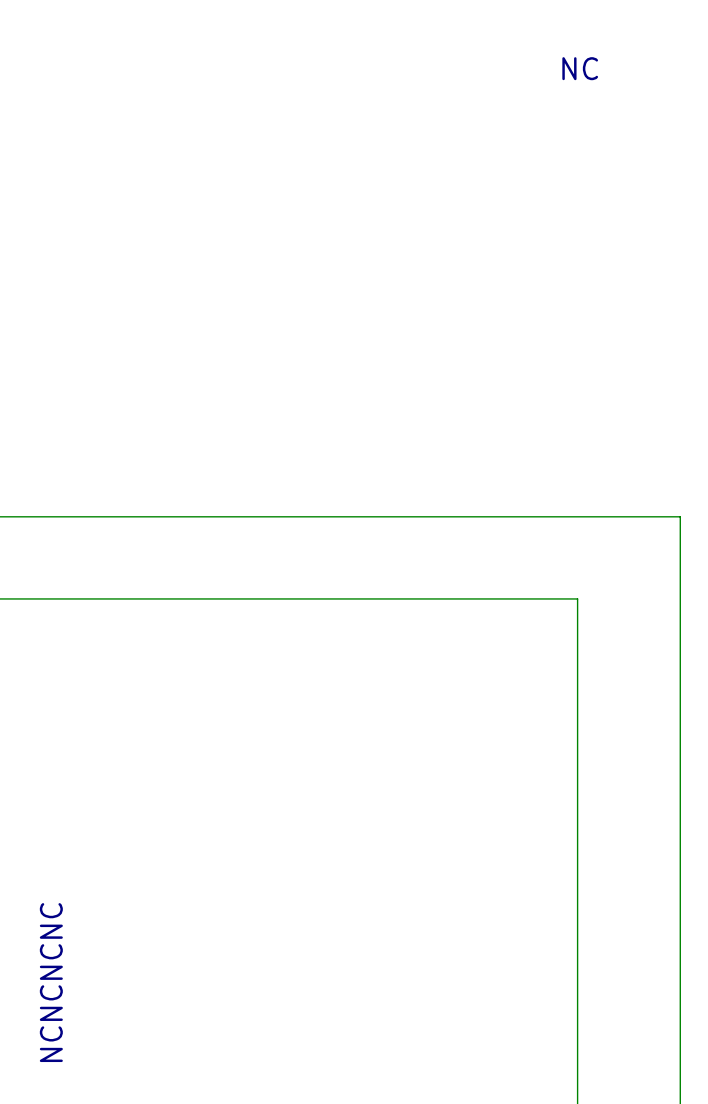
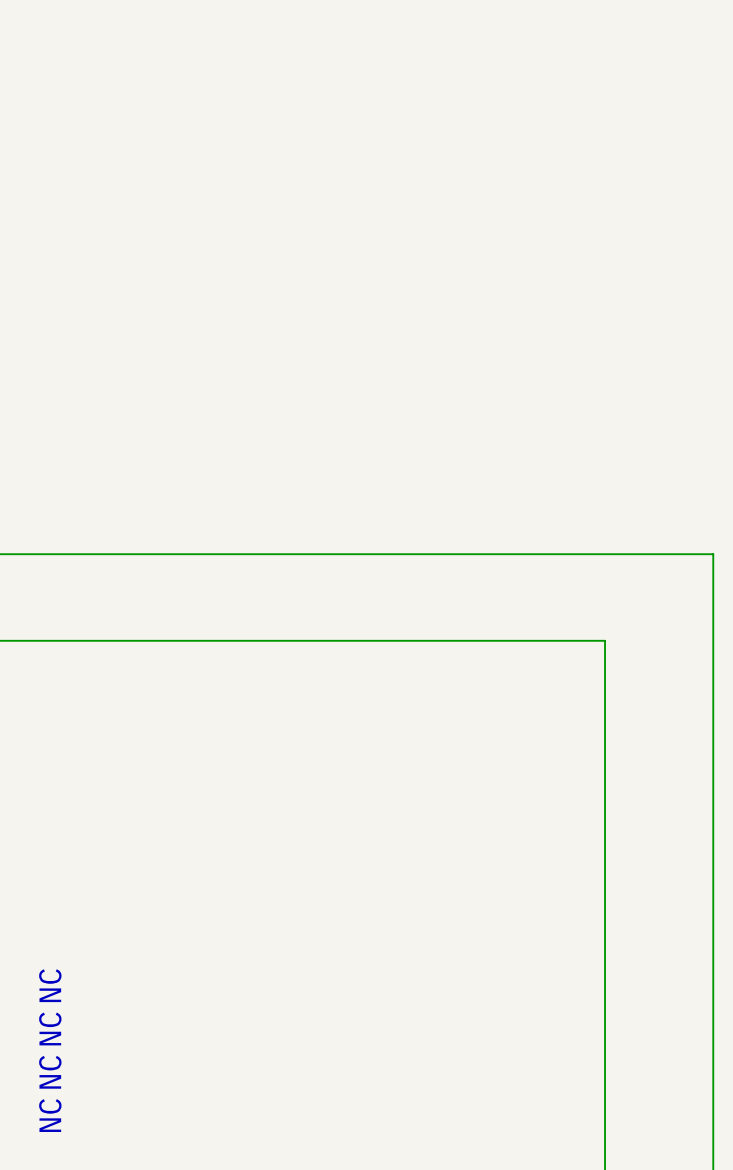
text: NC (580, 68) -> none

